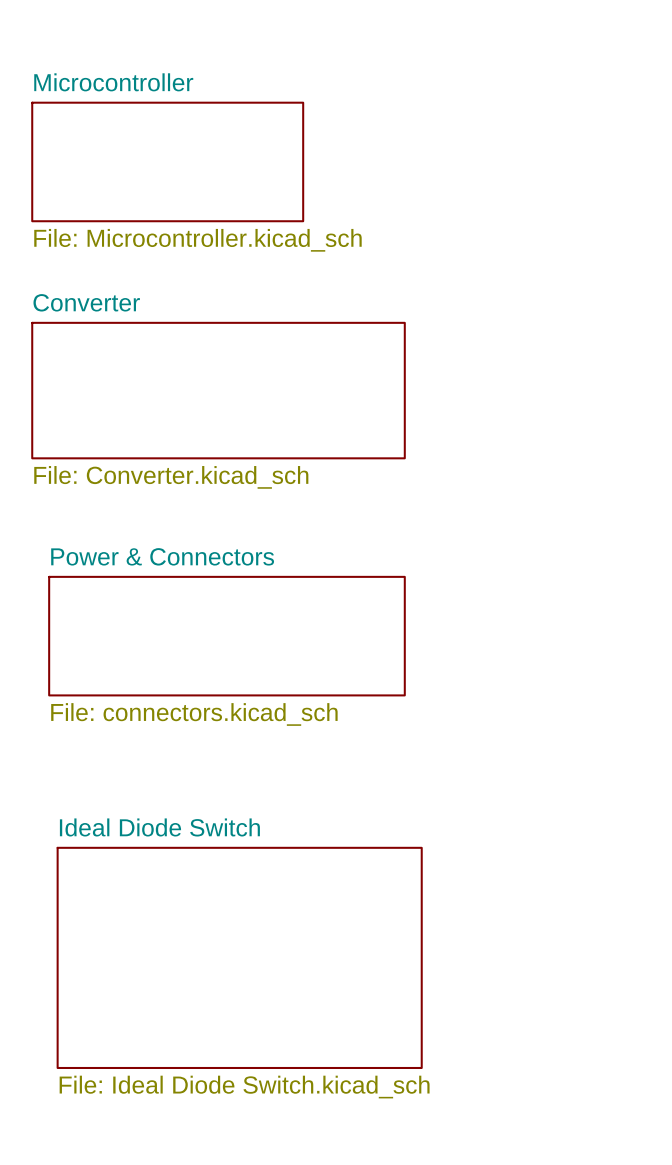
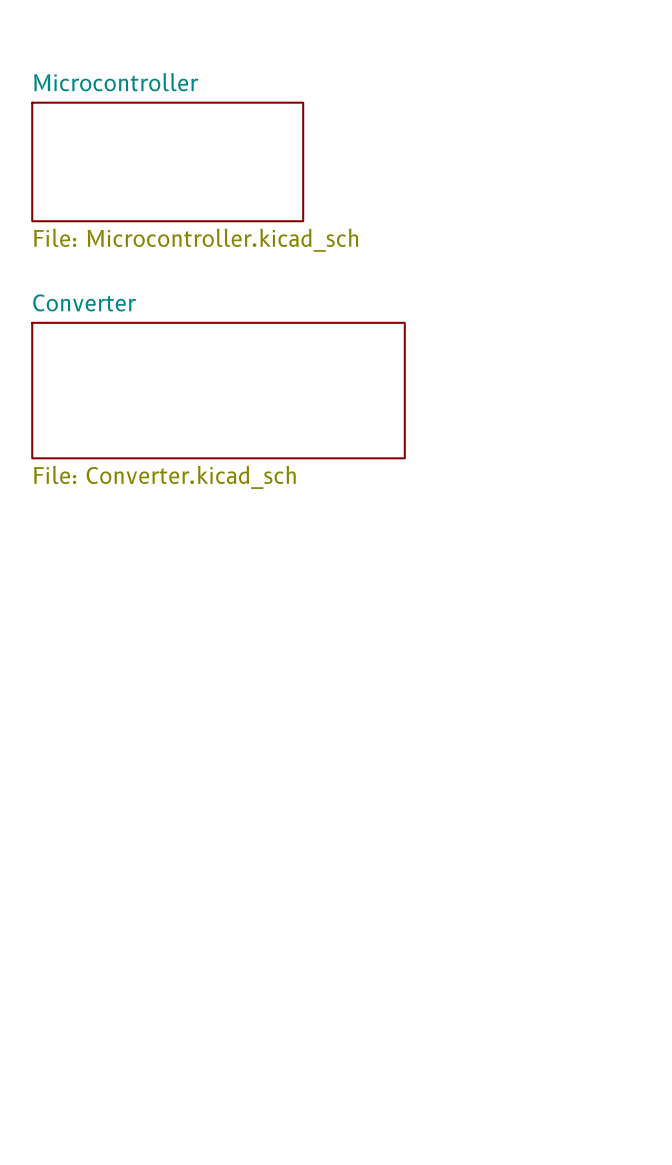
sheet Power & Connectors: File: connectors.kicad_sch (226, 636) -> none
sheet Ideal Diode Switch: File: Ideal Diode Switch.kicad_sch (239, 957) -> none

